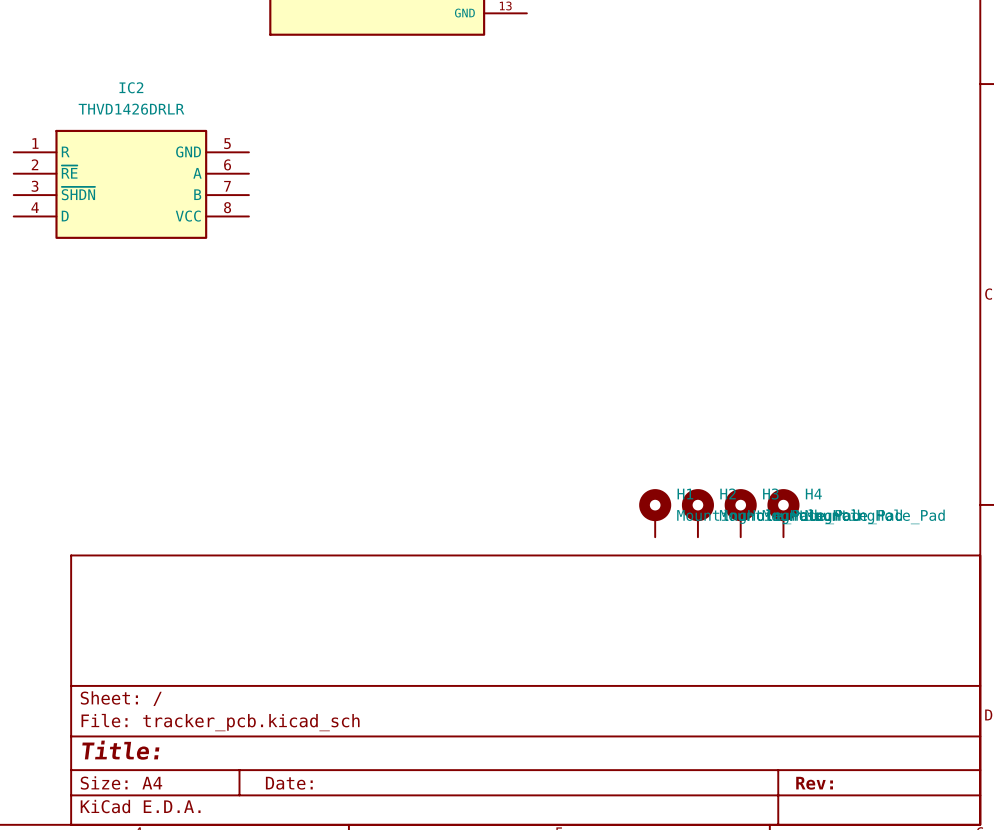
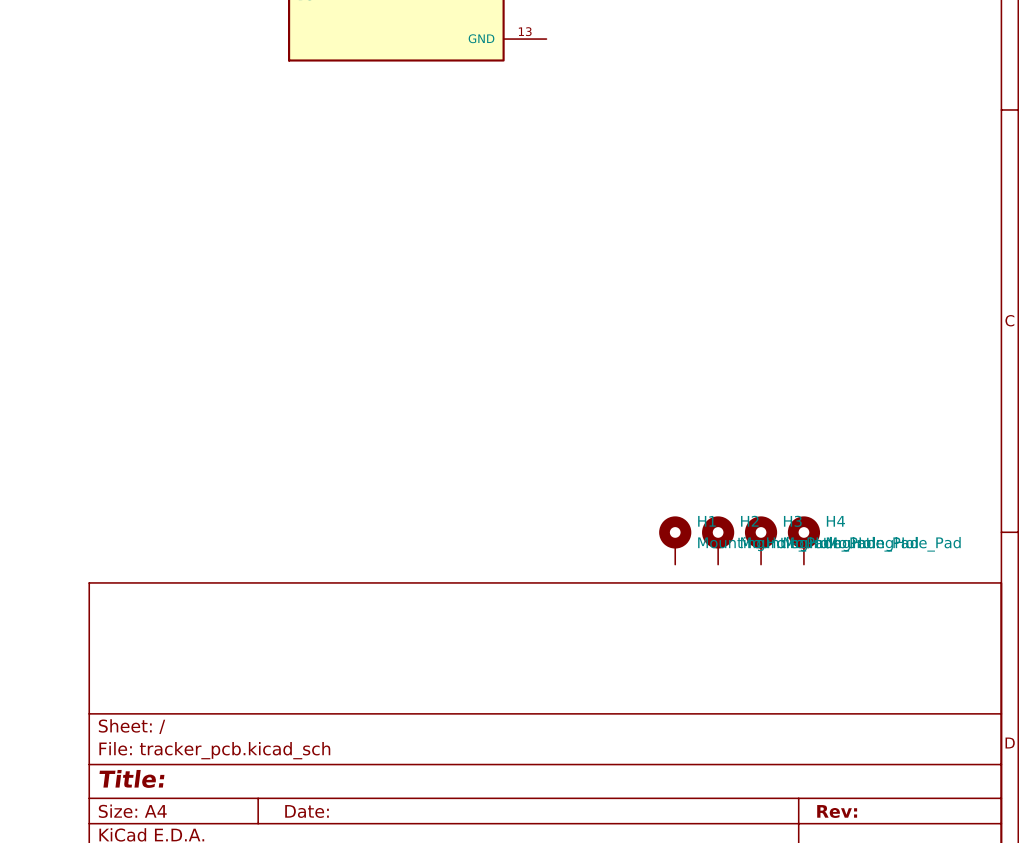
IC2: THVD1426DRLR (131, 184) -> none

